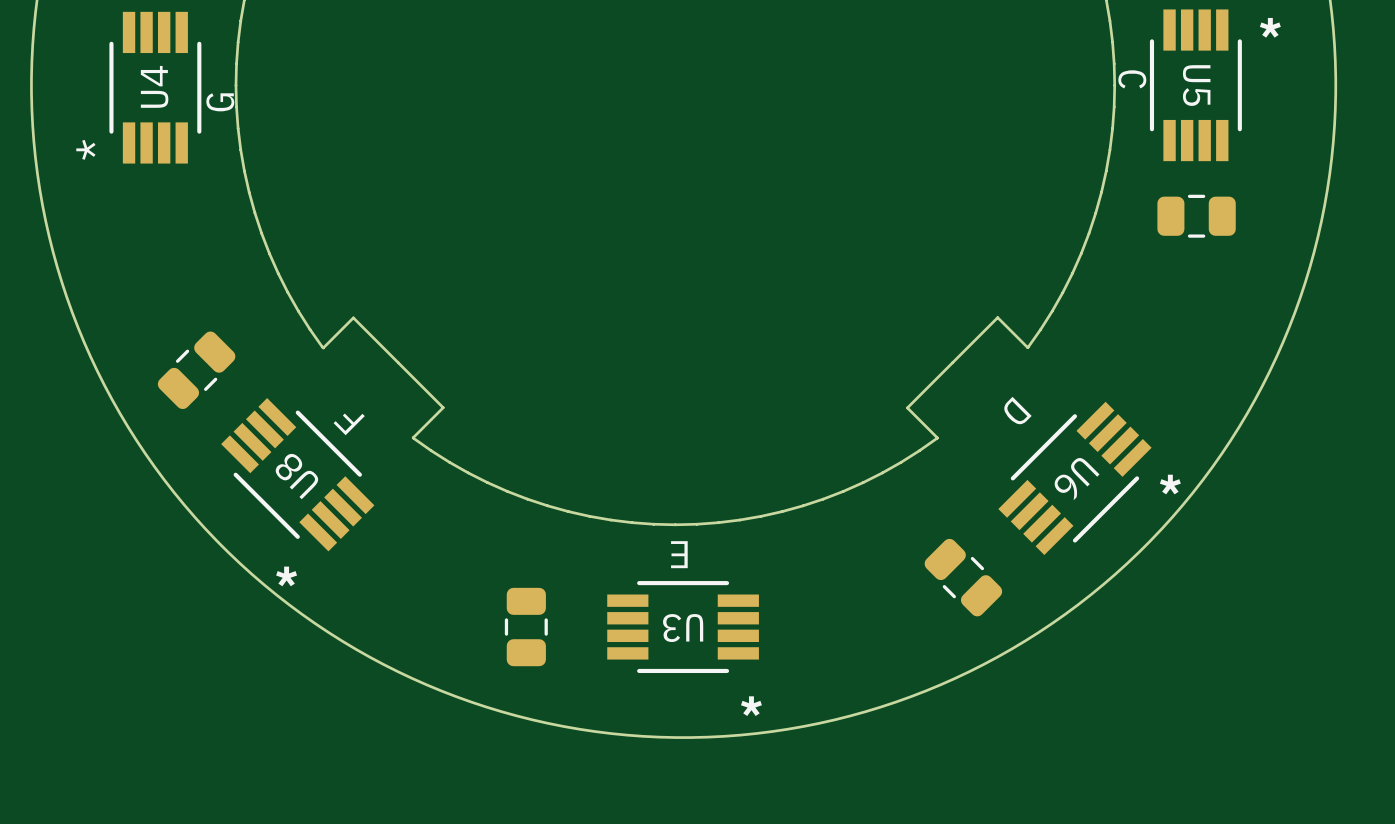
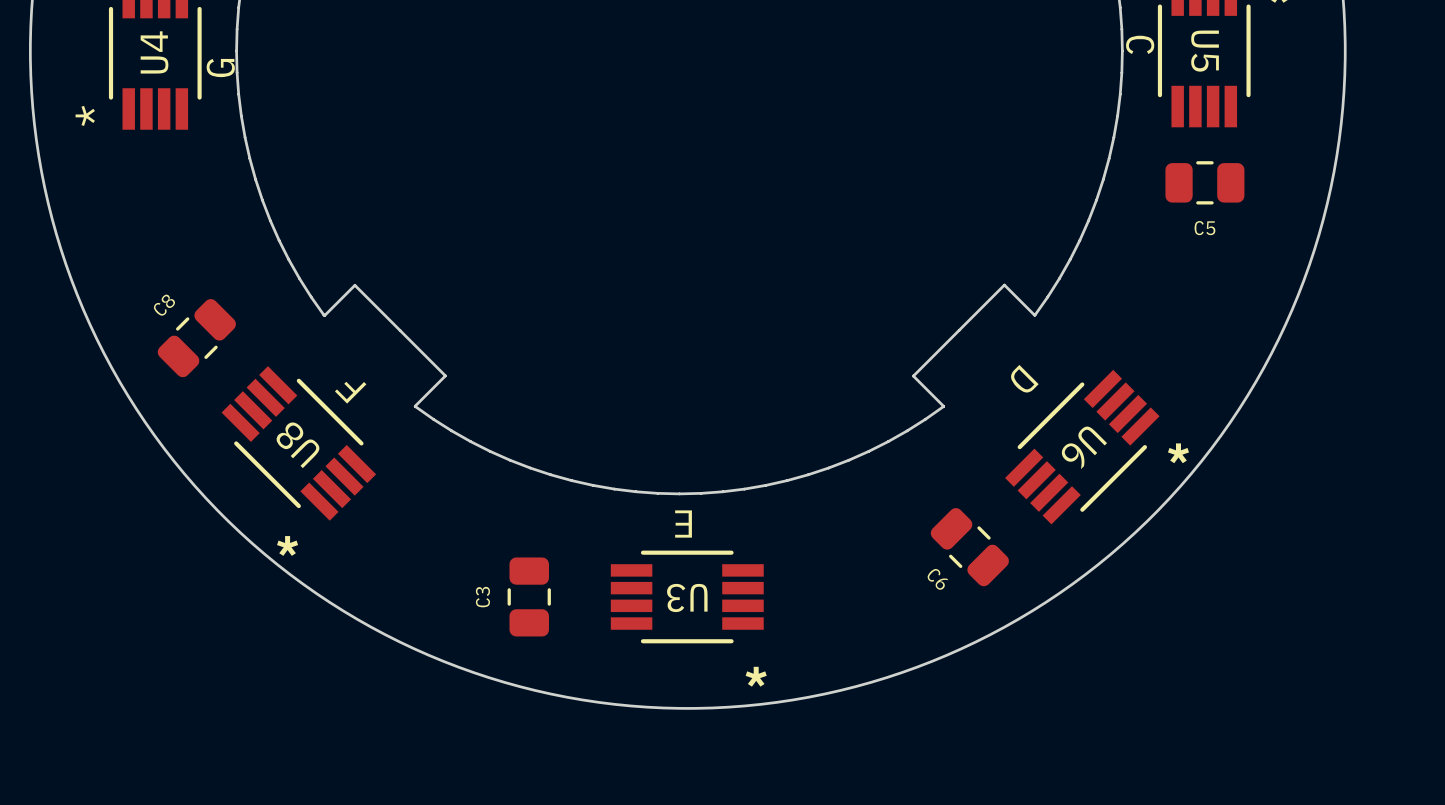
C5 name: none -> C5 (1204, 228)
C8 name: none -> C8 (164, 305)
C6 name: none -> C6 (937, 579)
C3 name: none -> C3 (482, 597)

